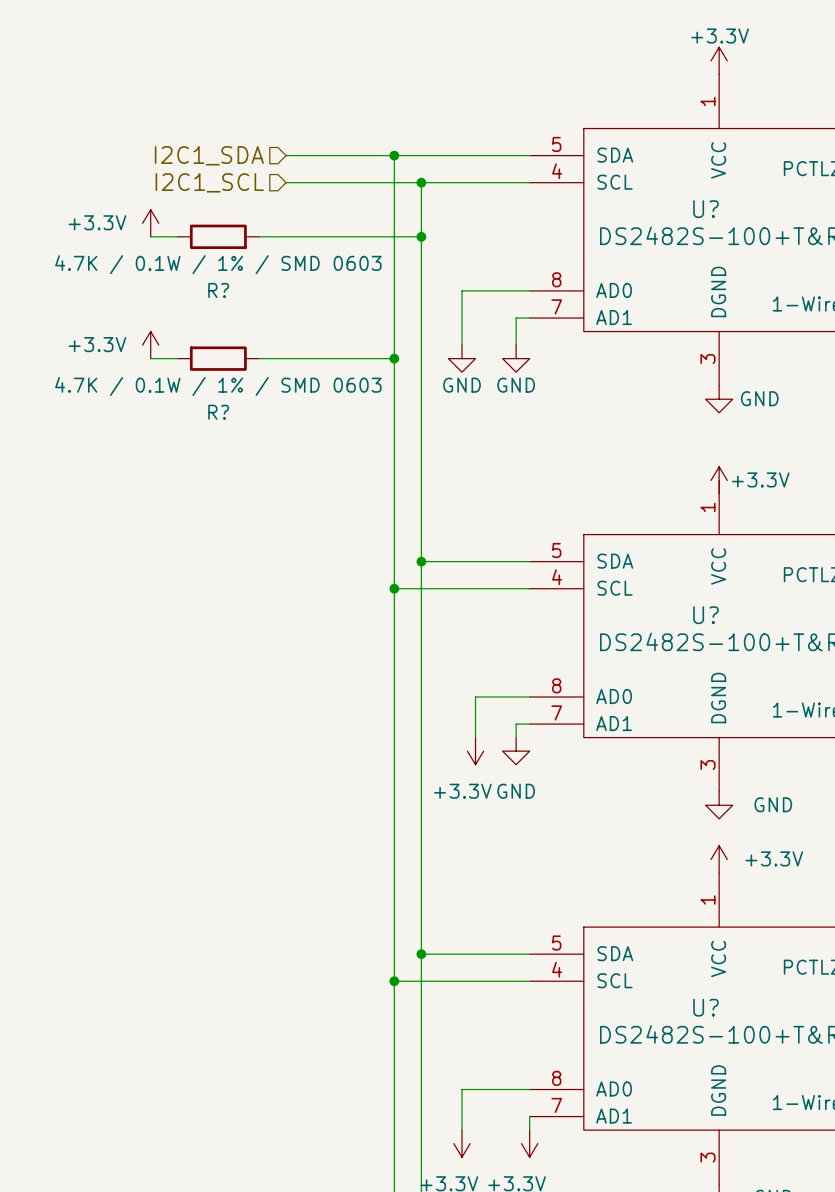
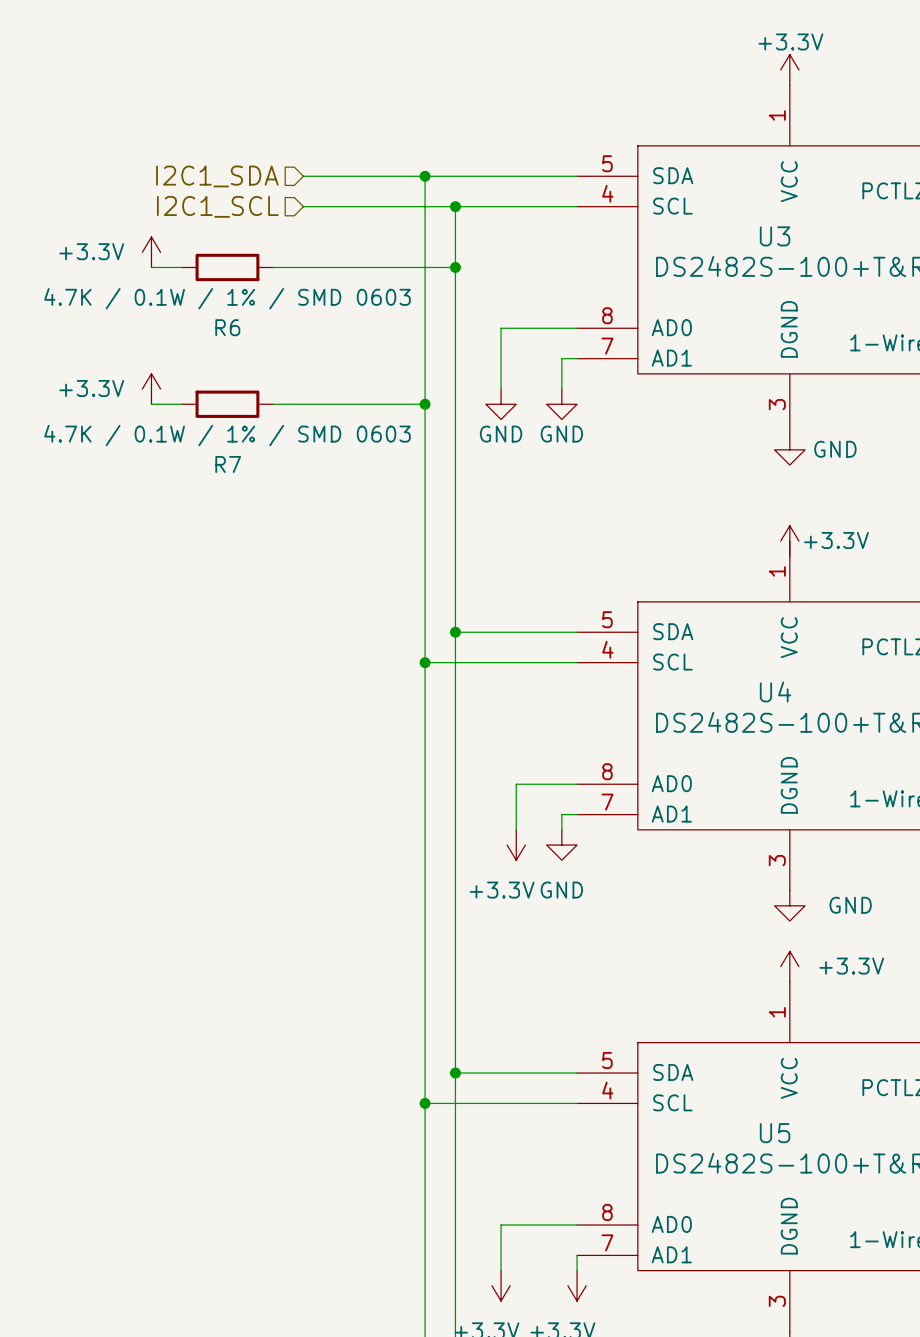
U? name: U? (706, 209) -> U3 (775, 236)
R? name: R? (218, 290) -> R6 (227, 327)
R? name: R? (218, 412) -> R7 (228, 464)
U? name: U? (706, 615) -> U4 (775, 691)
U? name: U? (706, 1007) -> U5 (775, 1133)

